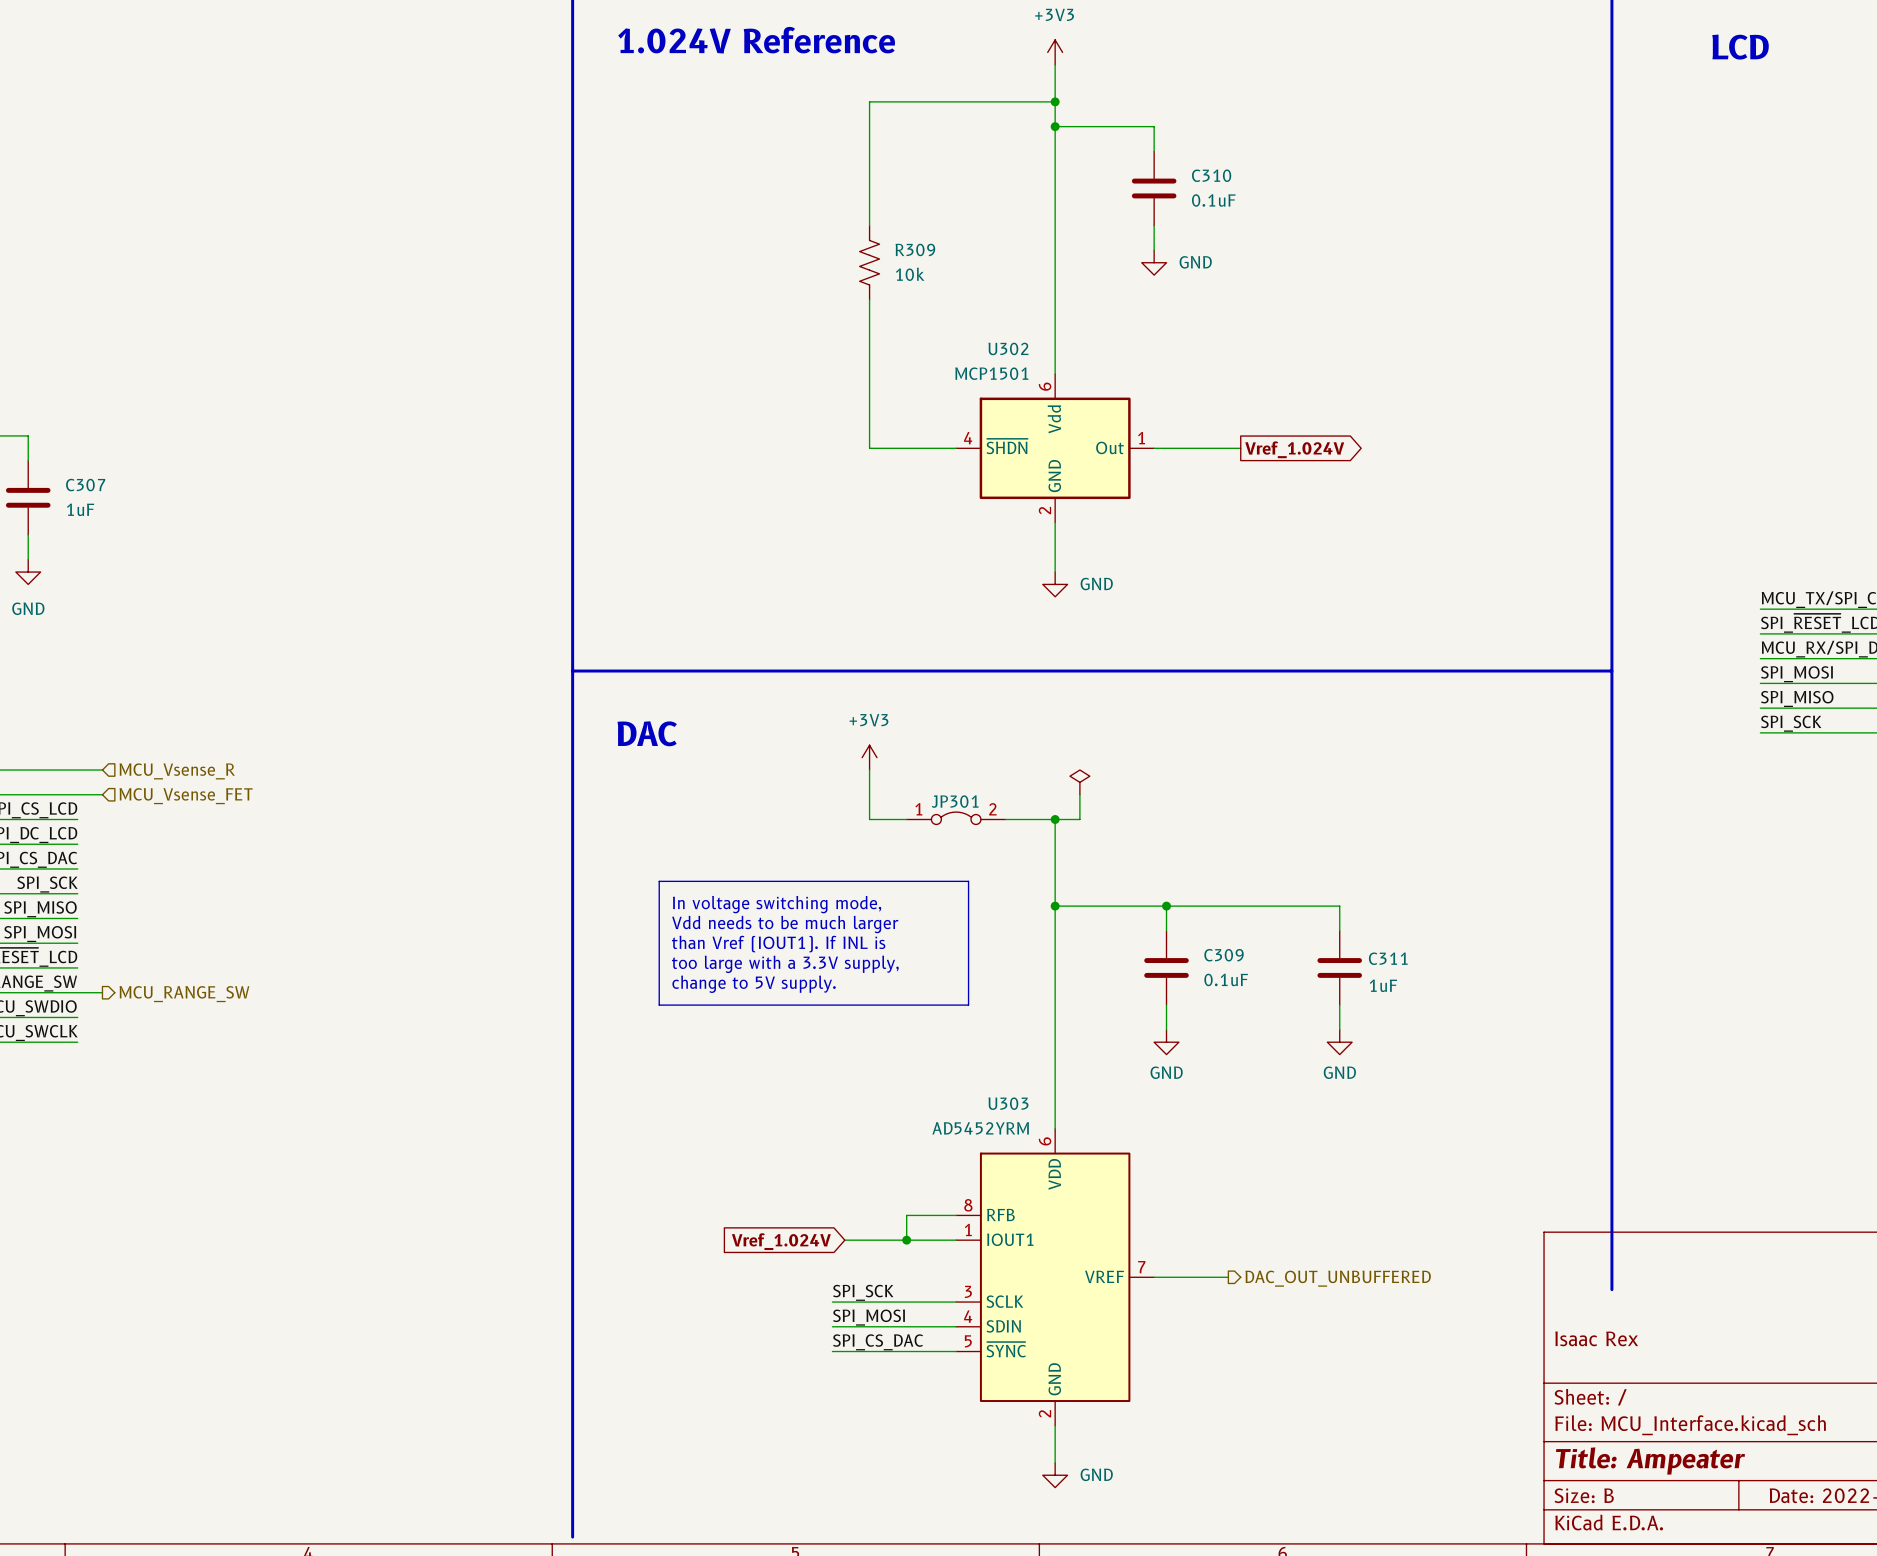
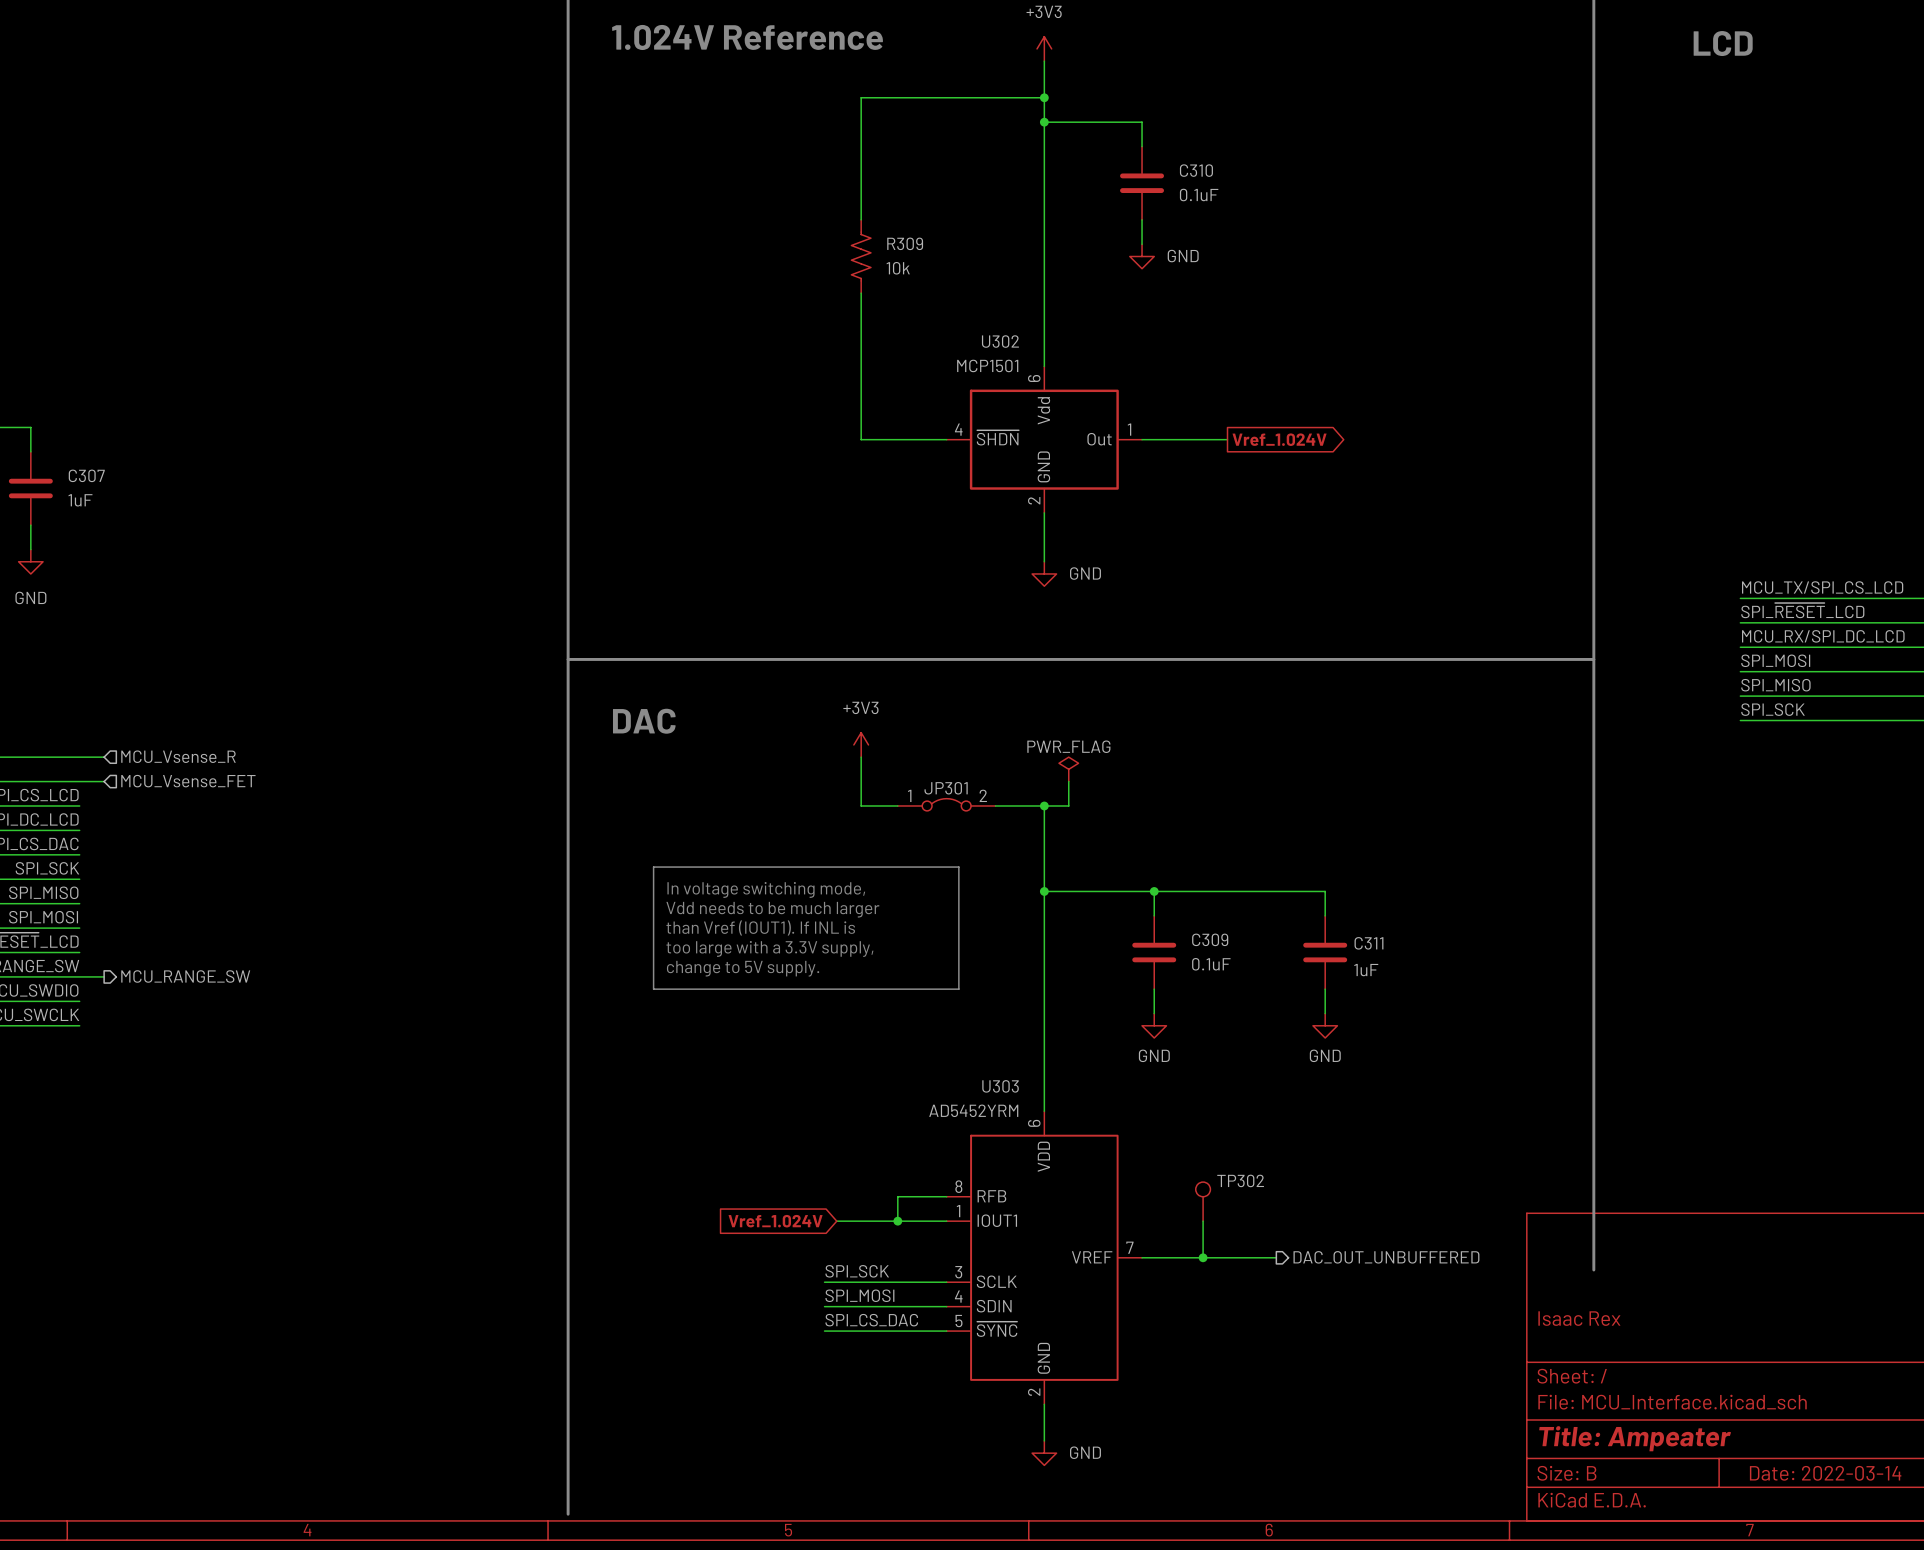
power symbol text: none -> PWR_FLAG (1068, 746)
TP302: none -> (1203, 1201)
wire: none -> (1203, 1221) (1203, 1257)
junction: none -> (1203, 1257)
wire: none -> (1215, 1257) (1276, 1257)
hierarchical label position: DAC_OUT_UNBUFFERED (1338, 1278) -> DAC_OUT_UNBUFFERED (1386, 1257)

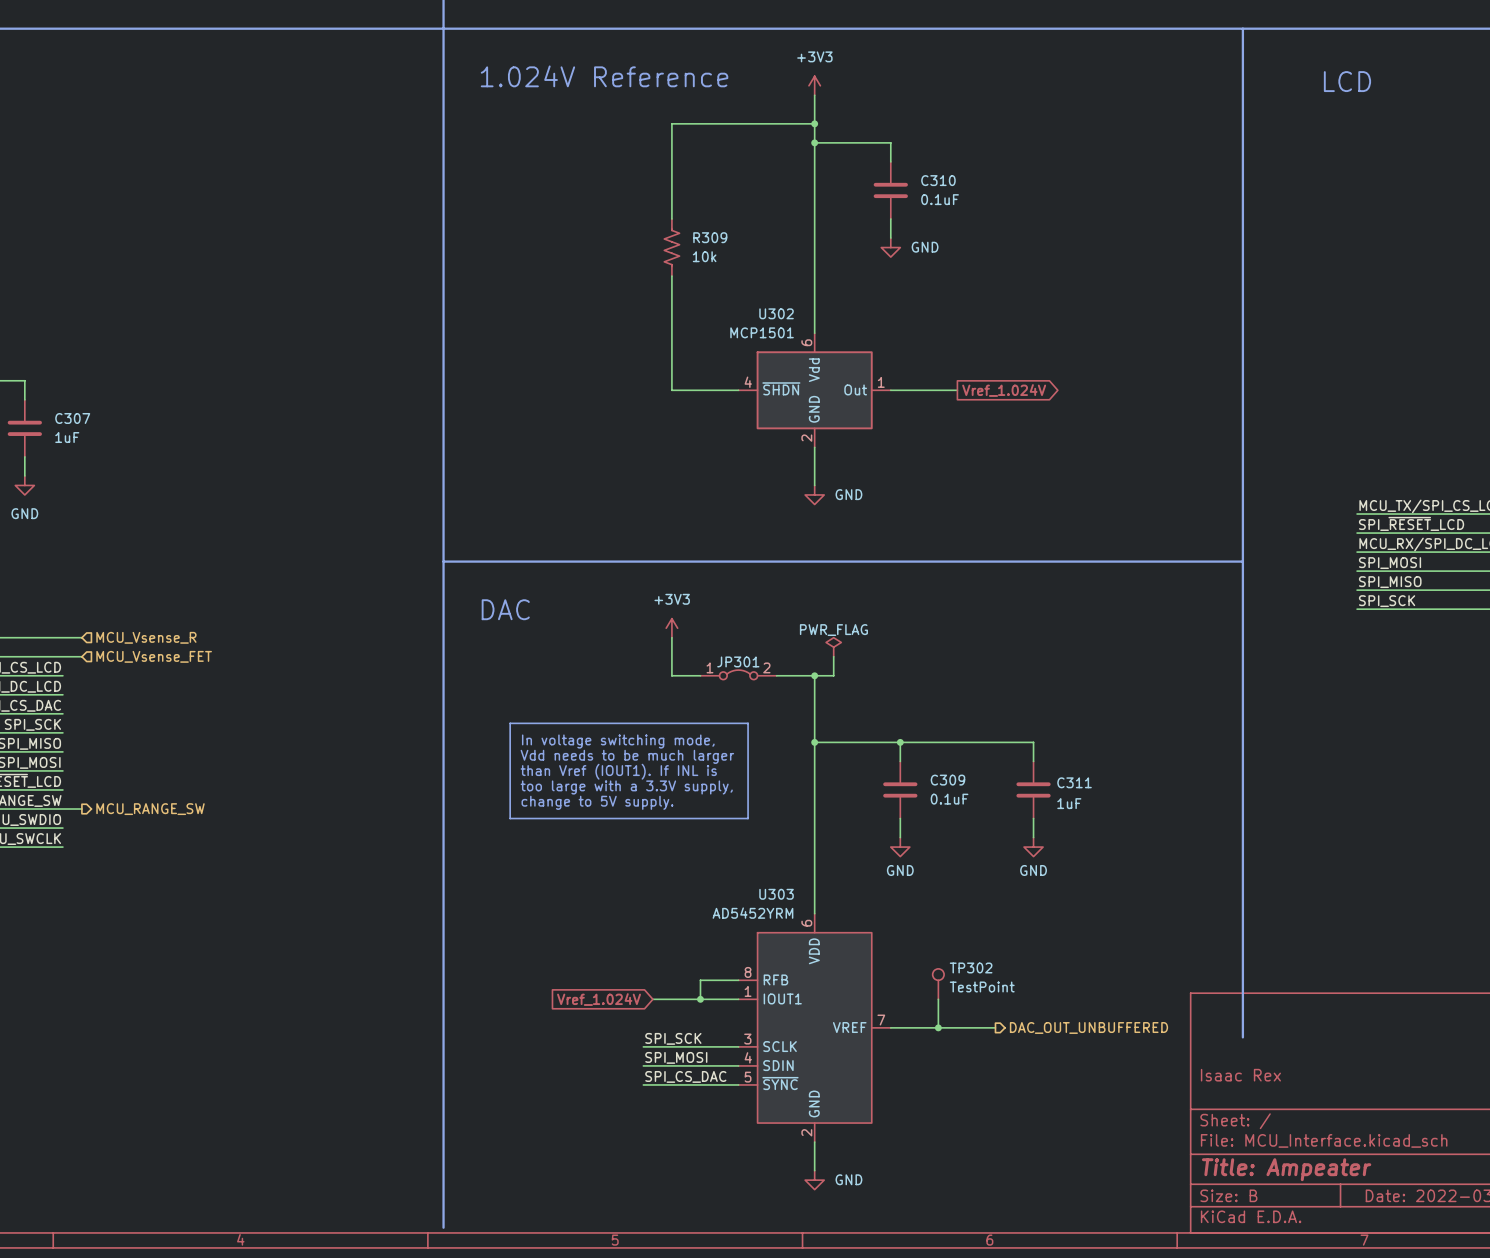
TP302 value: none -> TestPoint (982, 986)

